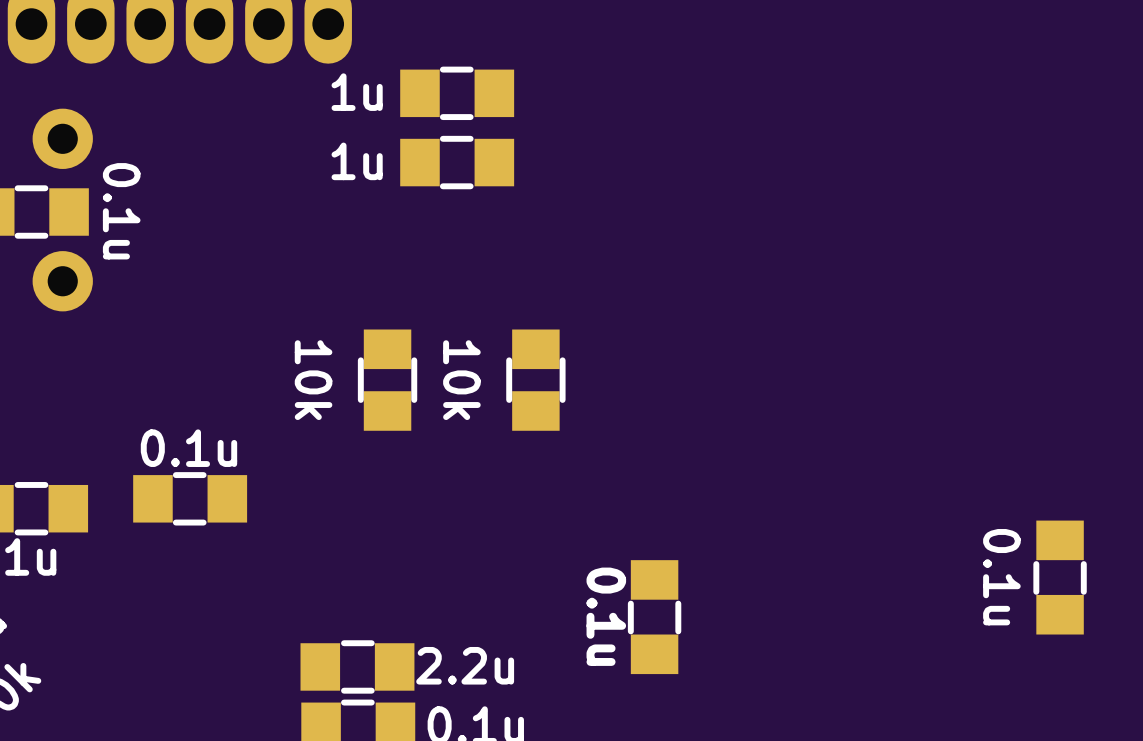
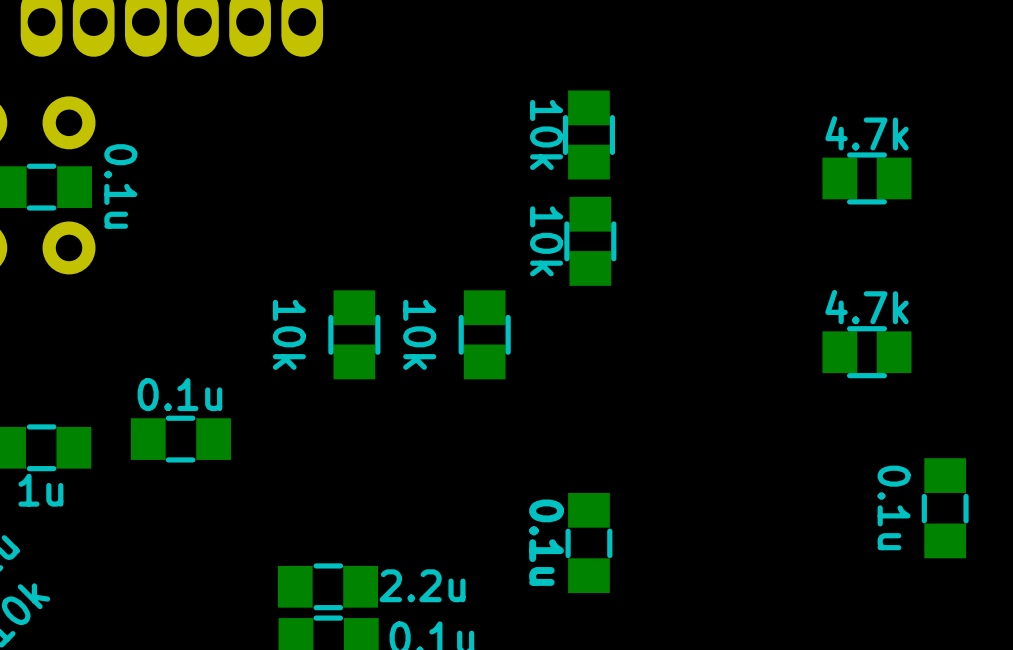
part: 1u (457, 93) -> none
part: none -> 10k (588, 135)
part: 1u (457, 162) -> none
part: none -> 4.7k (866, 178)
part: none -> 10k (590, 241)
part: none -> 4.7k (866, 352)

